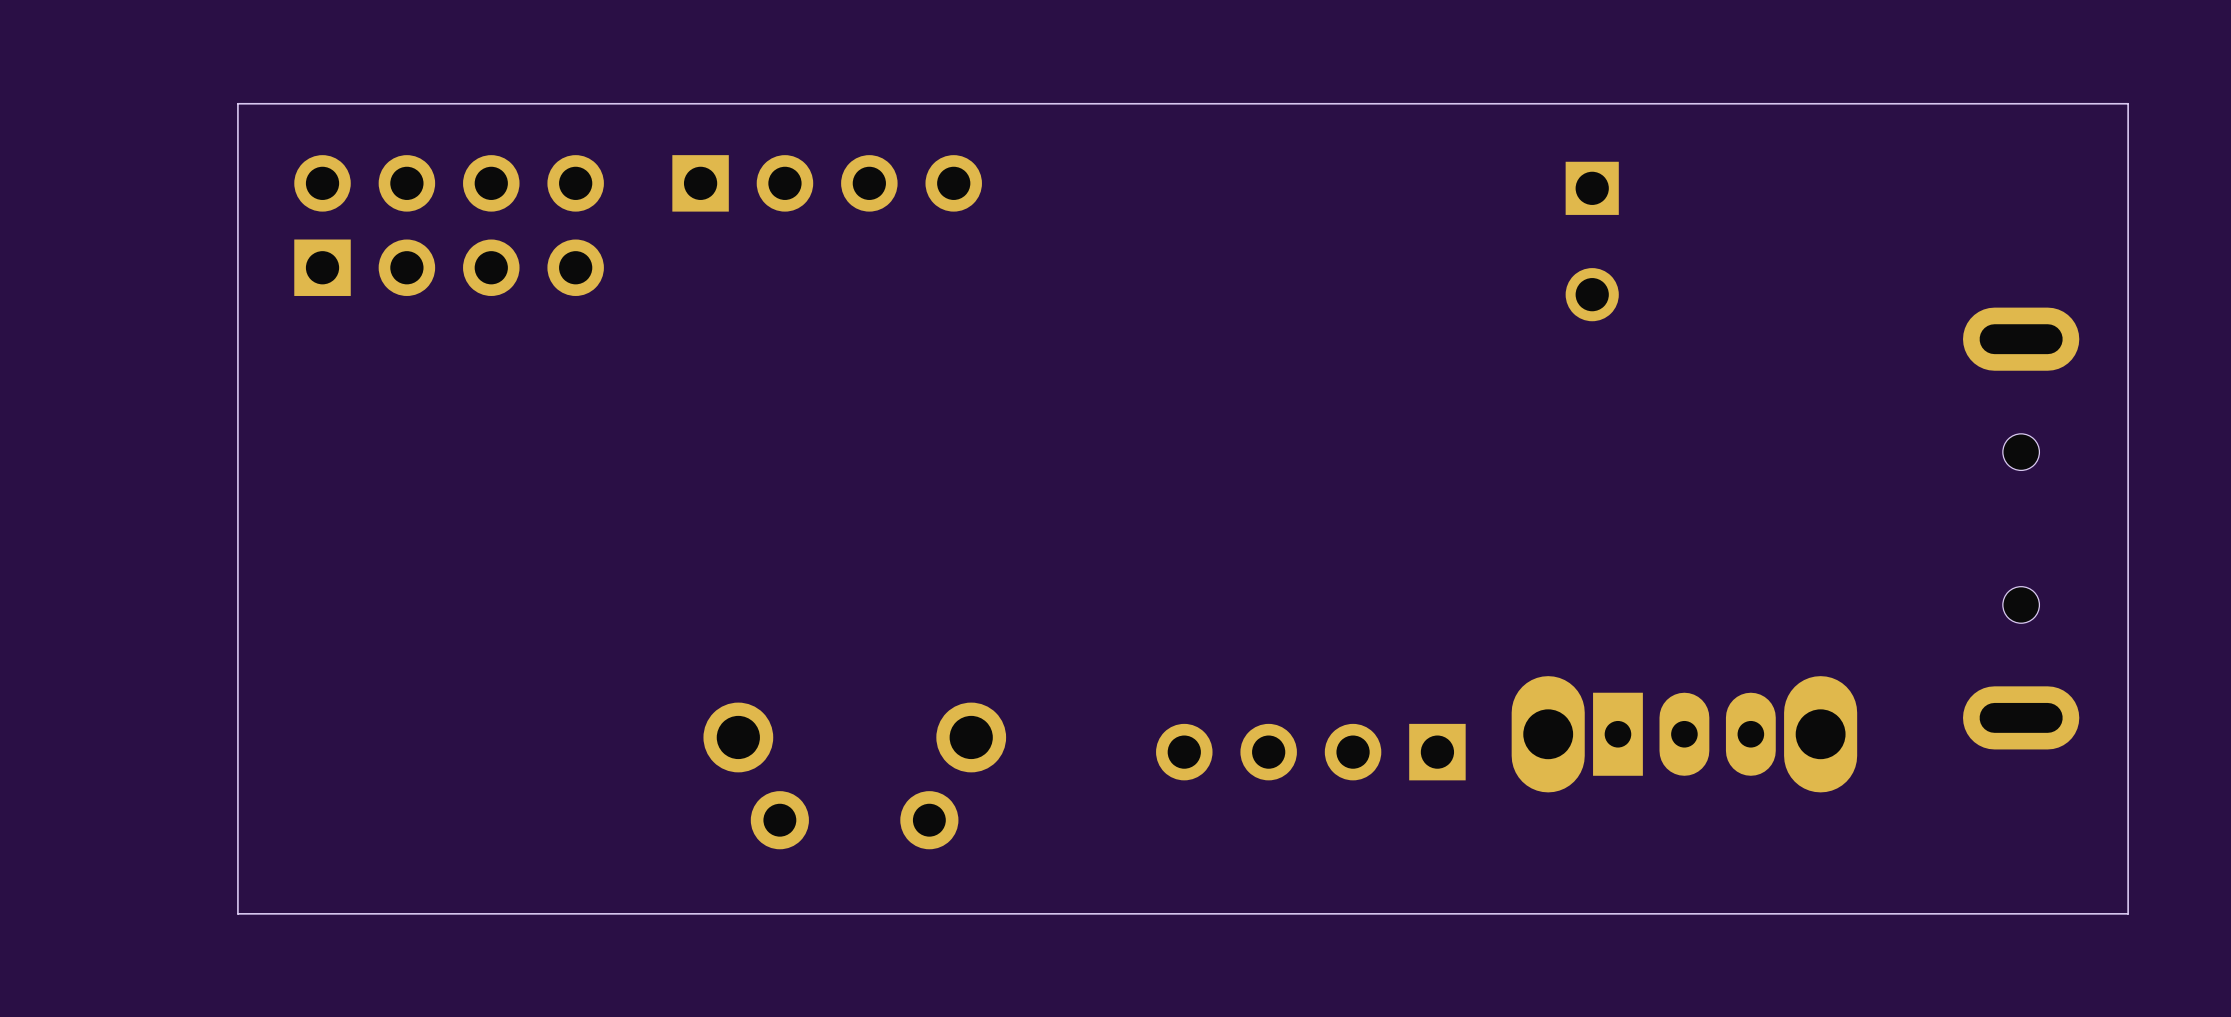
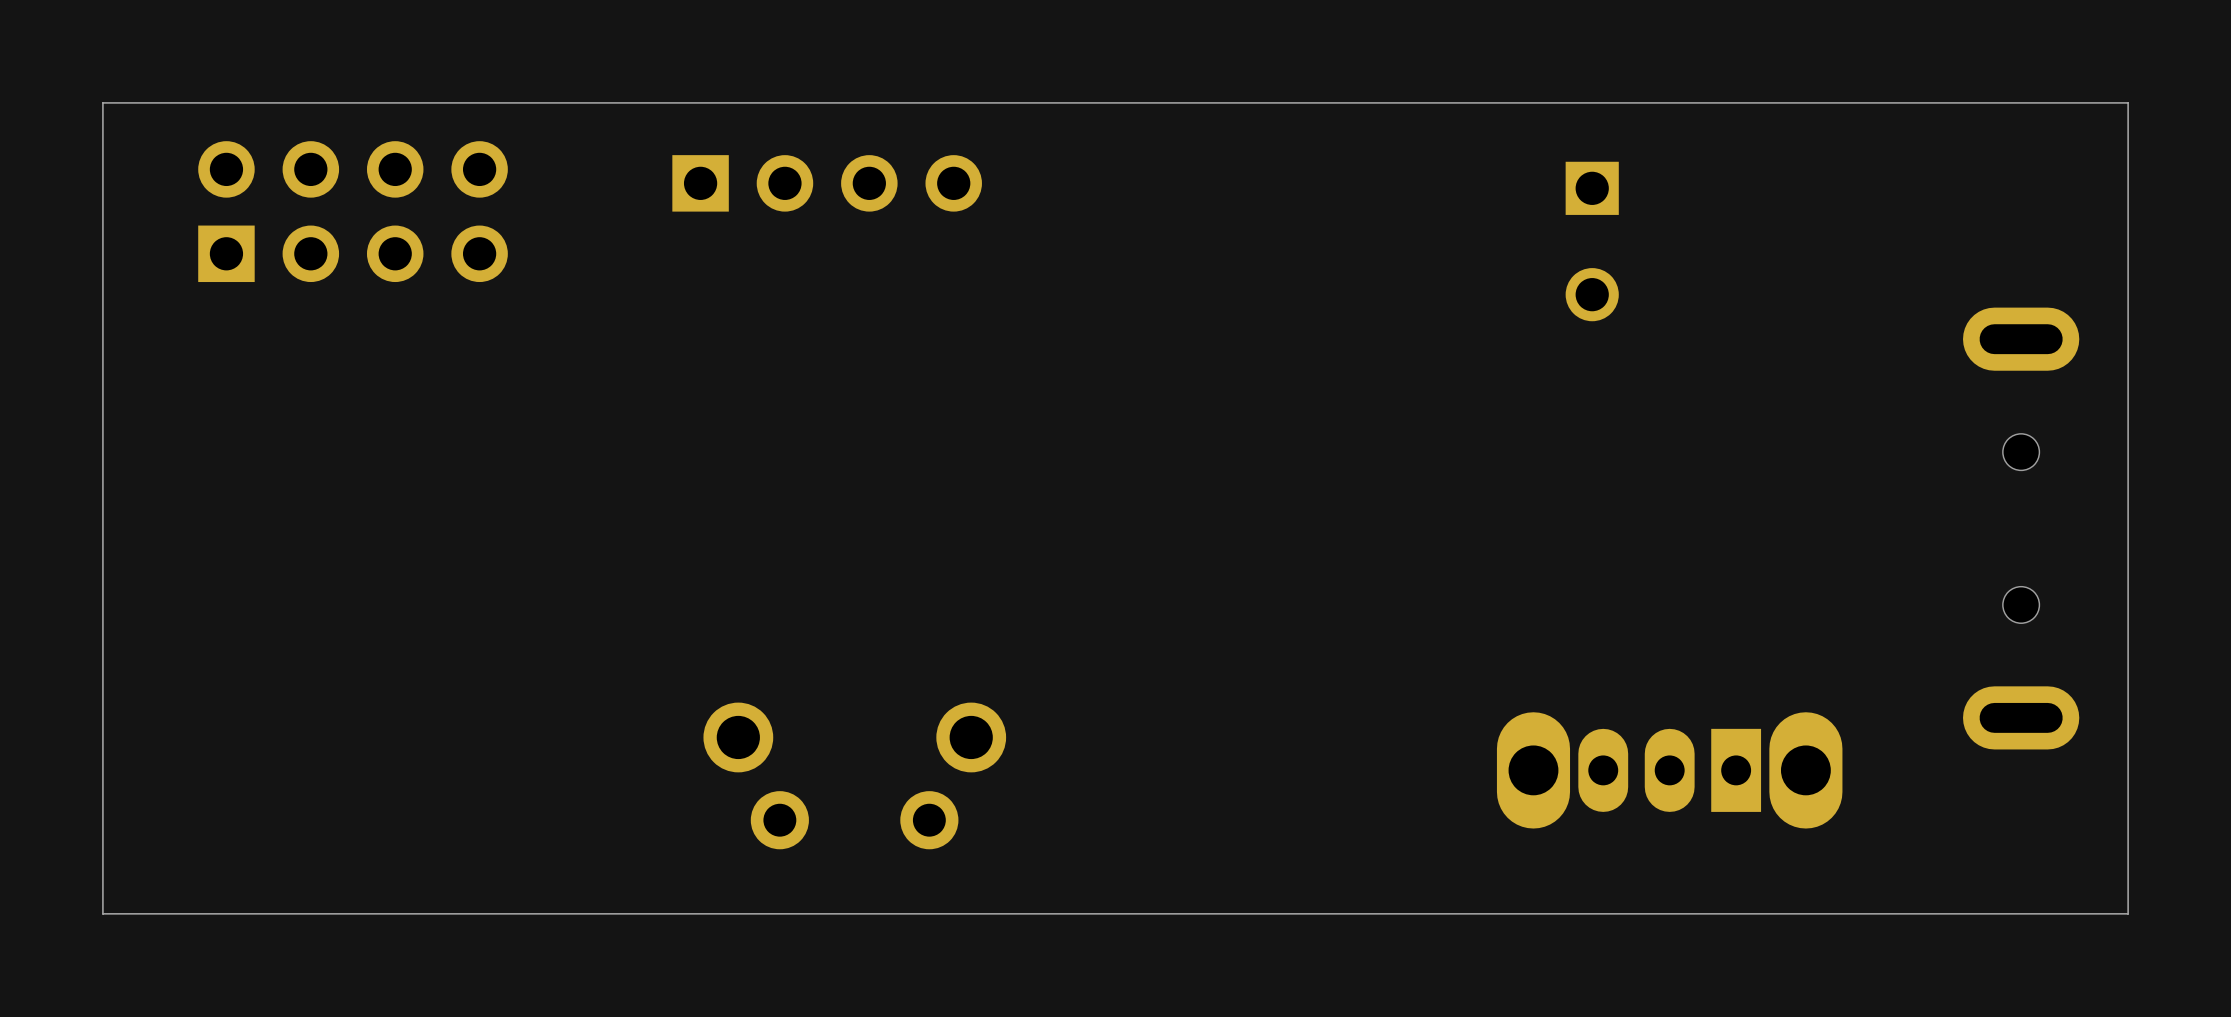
board edge: (2128, 103) (237, 103) (237, 913) -> (2128, 103) (102, 102) (102, 913) (237, 913)
part position: (449, 225) -> (353, 211)
part: (1684, 734) -> none
part: (1310, 752) -> none
part: none -> (1669, 770)

